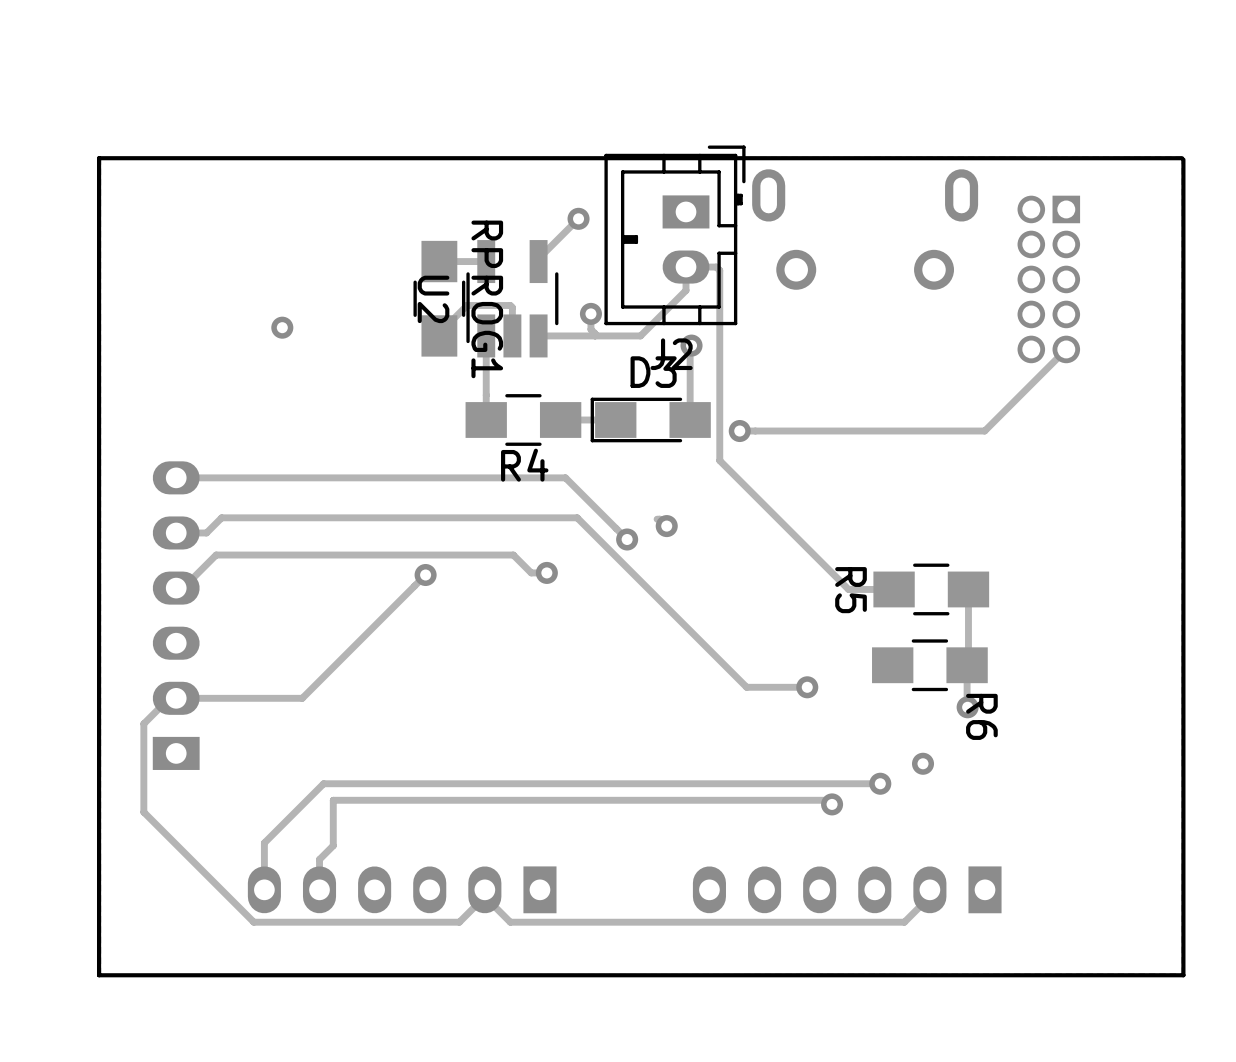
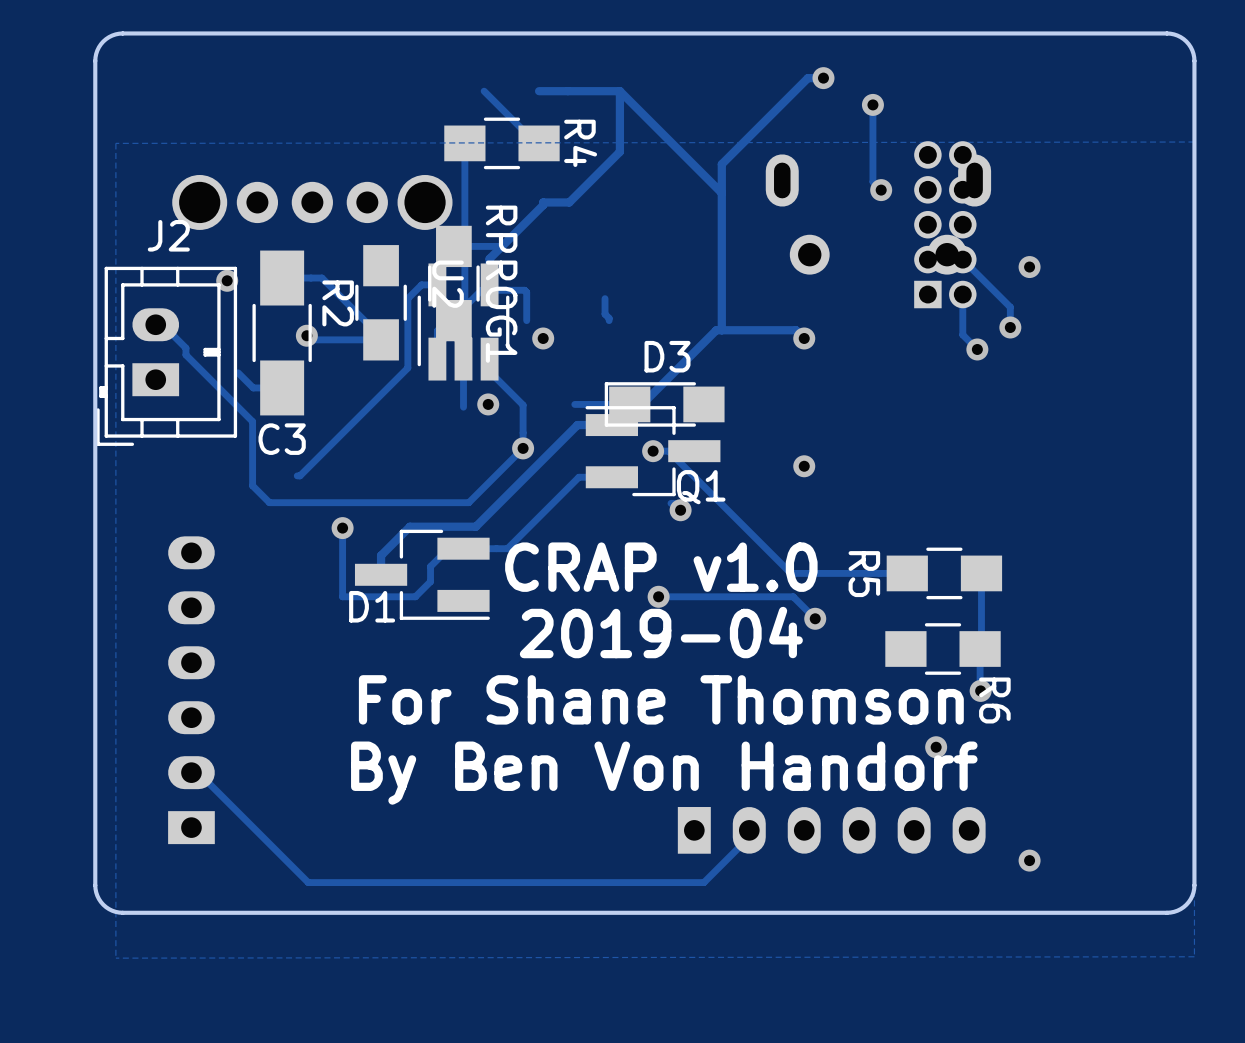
board edge: none -> (1166, 33) (122, 33) (106, 39) (98, 47) (95, 60) (95, 885) (100, 902) (112, 910) (122, 912) (1166, 912) (1183, 907) (1192, 895) (1194, 885) (1194, 60) (1192, 50) (1186, 41) (1177, 35) (1166, 33)
track: none -> (823, 78) (807, 78) (721, 164) (721, 330)
via: none -> (823, 78)
track: none -> (484, 91) (536, 143)
track: none -> (619, 91) (539, 91)
track: none -> (619, 91) (721, 193)
track: none -> (619, 91) (619, 151) (569, 202) (543, 202) (543, 205) (489, 258) (489, 284)
track: none -> (872, 104) (872, 181) (881, 190)
via: none -> (872, 104)
track: none -> (464, 143) (464, 303) (437, 330) (437, 359)
board edge: (1182, 158) (99, 158) (99, 975) (1183, 975) (1183, 159) -> none
via: none -> (881, 190)
part: none -> (312, 202)
track: (578, 218) (538, 258) (538, 261) -> none
via: (578, 218) -> none
J2 rotation: 0° (674, 235) -> 180° (166, 356)
J2 position: (674, 235) -> (166, 356)
track: none -> (962, 259) (1010, 307) (1010, 327)
part rotation: 0° (1048, 279) -> 180° (945, 224)
part position: (1048, 279) -> (945, 224)
via: none -> (1029, 267)
track: none -> (282, 278) (321, 278) (381, 337) (381, 339) (310, 339) (306, 335)
via: none -> (227, 280)
U2 position: (512, 298) -> (463, 322)
track: none -> (437, 284) (421, 284) (407, 298) (407, 368) (300, 475) (297, 475)
track: none -> (962, 294) (962, 334) (977, 349)
via: (590, 313) -> none
R2: none -> (381, 302)
via position: (282, 327) -> (306, 335)
track: (486, 335) (486, 419) -> none
track: (538, 335) (640, 335) (686, 290) (686, 267) (716, 267) (719, 270) (719, 460) (848, 589) -> (653, 451) (668, 451) (790, 573) (861, 573)
track: none -> (155, 324) (162, 324) (185, 348) (185, 354) (252, 421) (252, 485) (269, 502) (468, 502) (523, 448) (523, 405) (489, 371) (489, 359)
via: none -> (1010, 327)
track: (691, 345) (690, 419) -> none
via: (691, 345) -> none
C3: none -> (282, 332)
track: (1066, 349) (984, 431) (739, 431) -> none
via: none -> (543, 338)
track: none -> (804, 338) (796, 330) (716, 330) (621, 425) (577, 425) (475, 526) (409, 526) (381, 555) (381, 574)
via: none -> (804, 338)
via: none -> (977, 349)
track: none -> (463, 359) (463, 407)
track: none -> (238, 372) (253, 387) (282, 387)
via: none -> (488, 404)
R4 position: (523, 419) -> (501, 143)
via: (739, 431) -> none
via: none -> (523, 448)
R4 name rotation: 0° (524, 465) -> 90° clockwise (580, 143)
R4 name position: R4 (524, 465) -> R4 (580, 143)
Q1: none -> (652, 451)
via: none -> (653, 451)
track: (176, 477) (565, 477) (627, 539) -> none
via: none -> (804, 466)
track: none -> (611, 477) (578, 477) (507, 548) (448, 548) (430, 566) (430, 581) (415, 596) (342, 596) (342, 528)
track: (176, 532) (206, 532) (221, 517) (577, 517) (746, 687) (807, 687) -> none
via: (627, 539) -> none
via: none -> (342, 528)
track: (546, 572) (531, 572) (513, 555) (216, 555) (183, 588) (176, 588) -> none
via: (546, 572) -> none
track: (425, 575) (302, 698) (169, 698) (143, 723) (143, 812) (253, 922) (459, 922) (484, 896) -> none
via: (425, 575) -> none
text: none -> CRAP v1.0 (661, 567)
D1: none -> (422, 574)
track: none -> (658, 596) (793, 596) (815, 618)
via: none -> (658, 596)
part position: (176, 615) -> (191, 690)
text: none -> 2019-04 (661, 632)
via position: (807, 687) -> (815, 618)
text: none -> For Shane Thomson (661, 699)
track: (880, 783) (323, 783) (264, 842) (264, 889) -> none
via: (880, 783) -> none
track: none -> (191, 772) (198, 772) (308, 882) (703, 882) (749, 837) (749, 830)
text: none -> By Ben Von Handorf (664, 773)
track: (832, 804) (827, 800) (333, 800) (333, 845) (319, 859) (319, 889) -> none
via: (832, 804) -> none
via: none -> (1029, 860)
part: (402, 889) -> none
part rotation: 0° (847, 889) -> 180° (831, 830)
track: (929, 889) (929, 896) (904, 922) (510, 922) (484, 896) -> none

